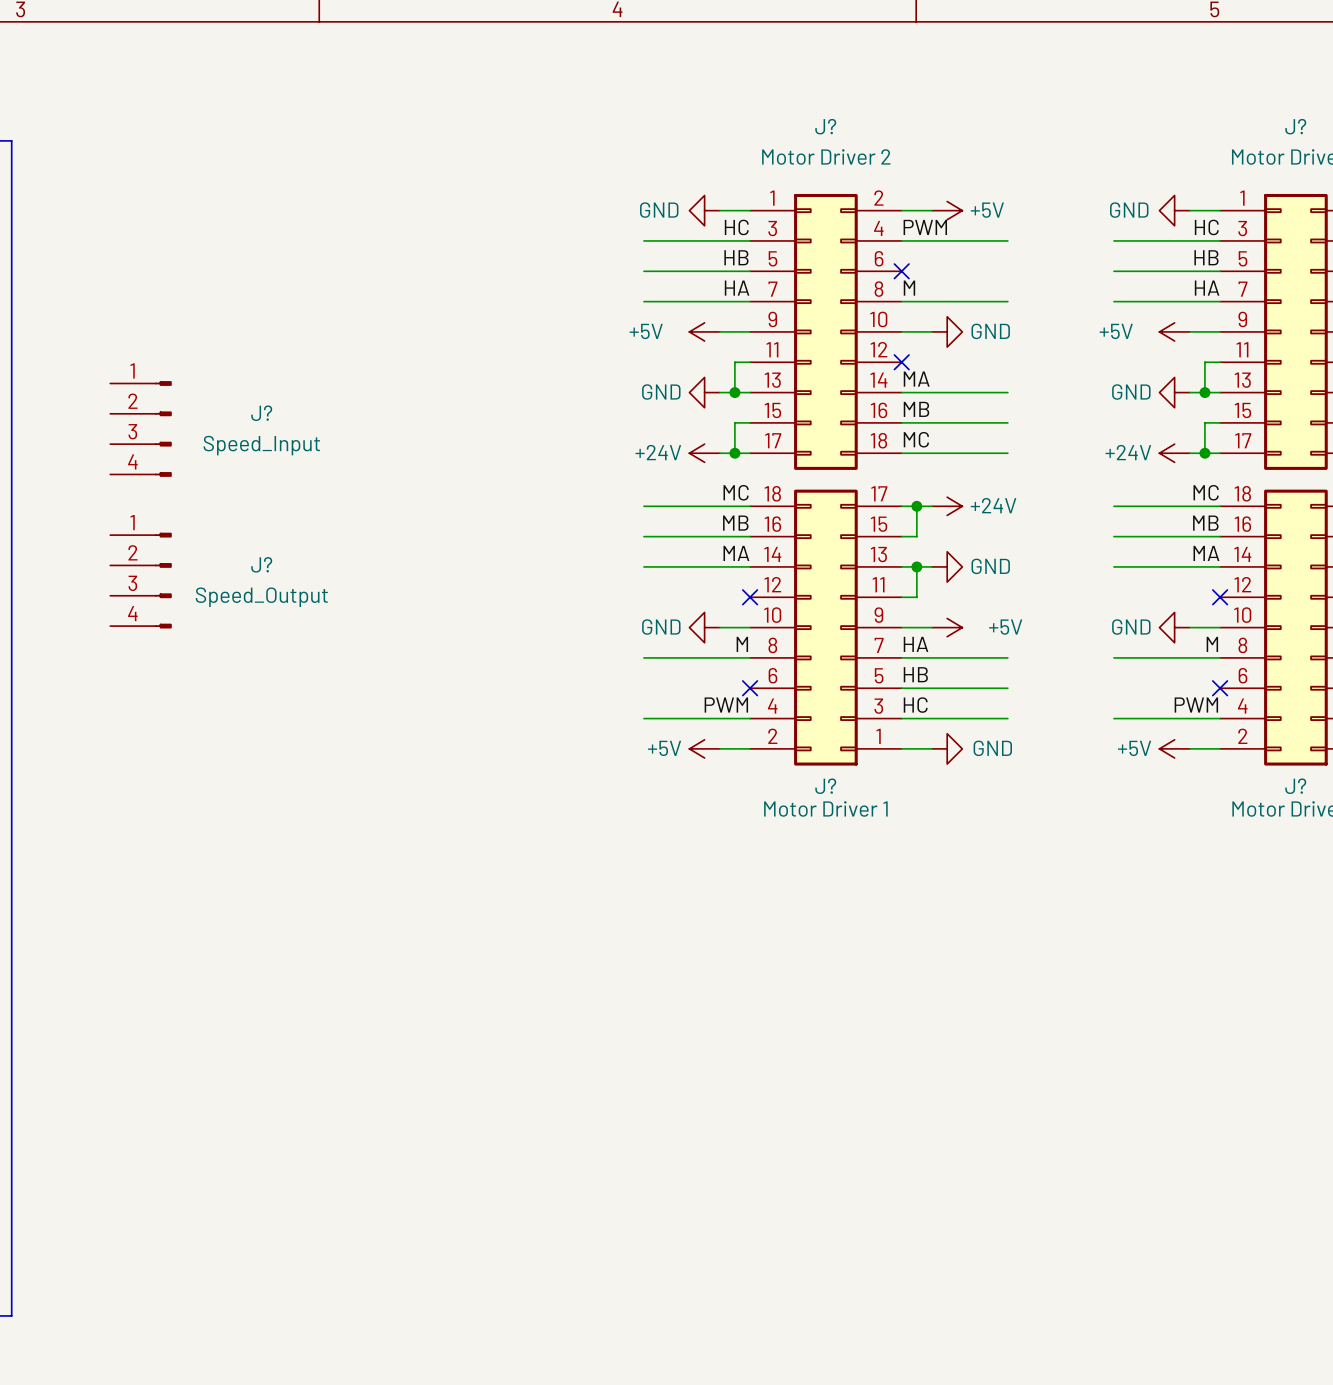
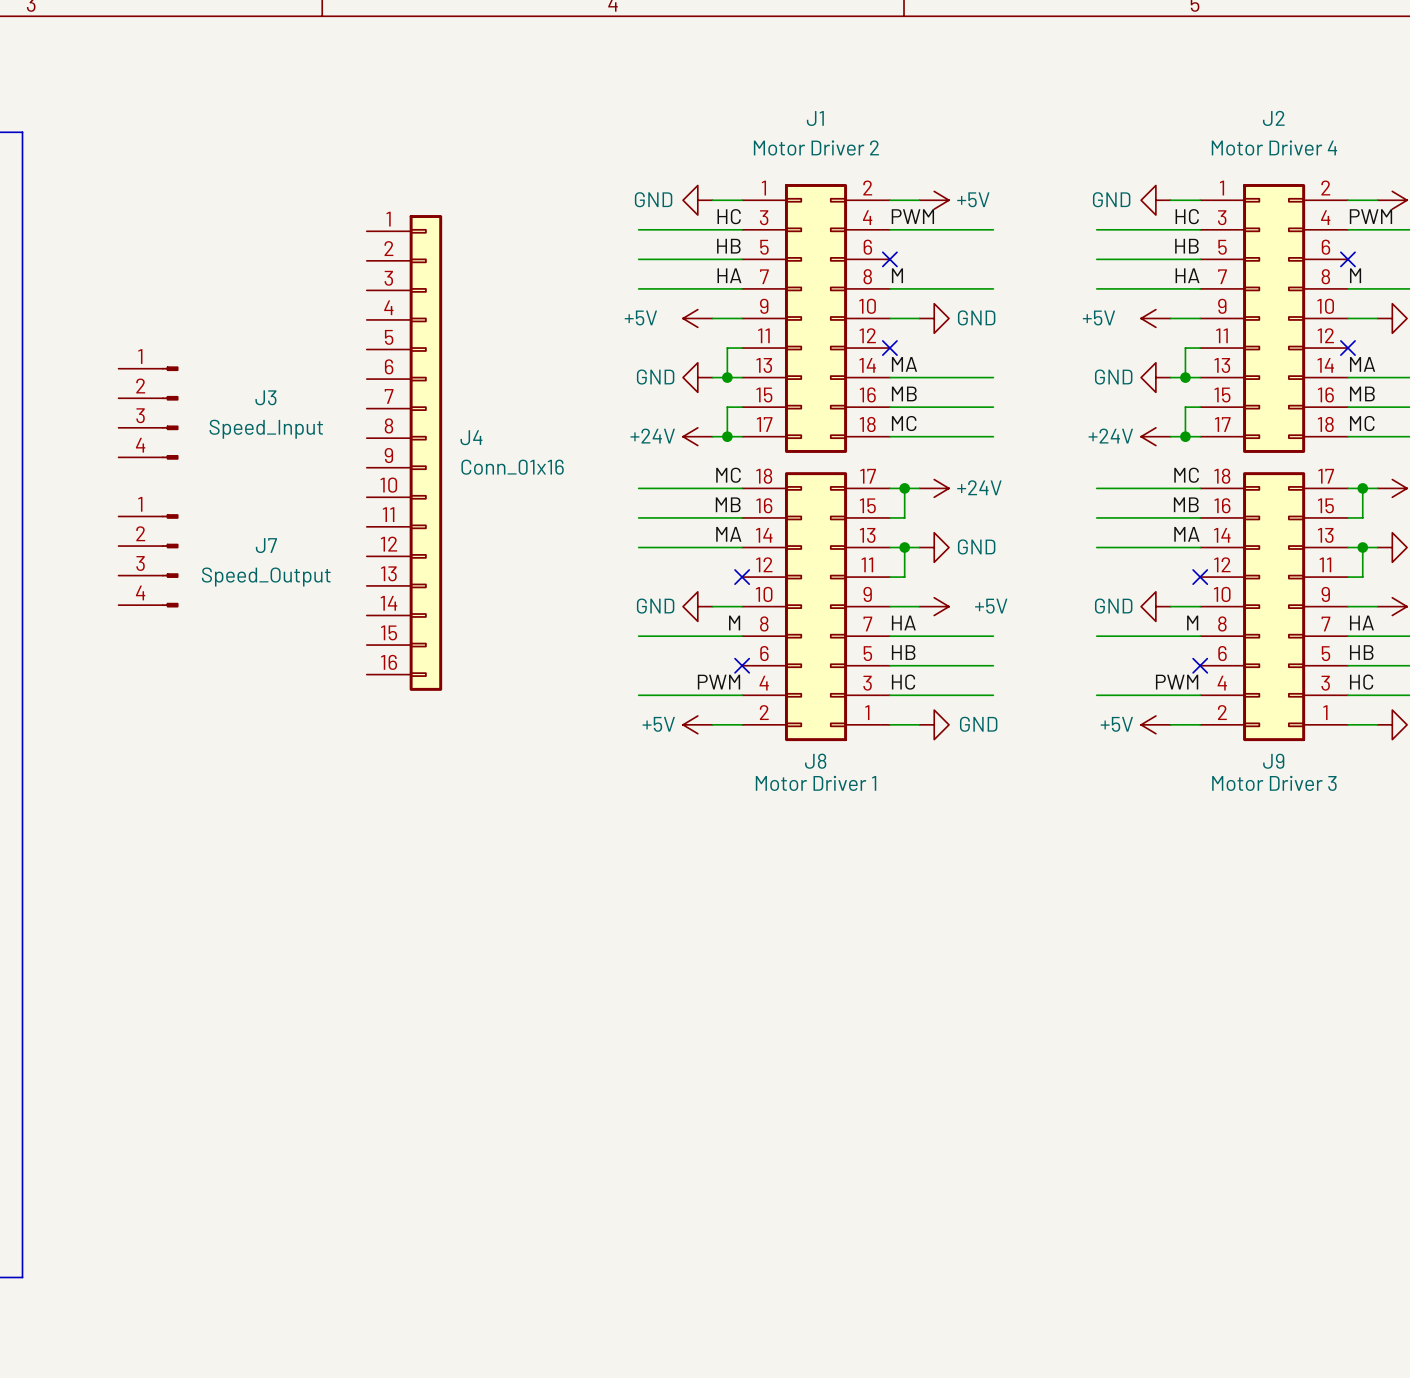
J? name: J? (825, 126) -> J1 (815, 118)
J? name: J? (1295, 126) -> J2 (1273, 118)
J? name: J? (261, 413) -> J3 (265, 397)
J4: none -> Conn_01x16 (404, 452)
J? name: J? (261, 564) -> J7 (266, 545)
J? name: J? (825, 786) -> J8 (815, 761)
J? name: J? (1295, 786) -> J9 (1273, 761)

